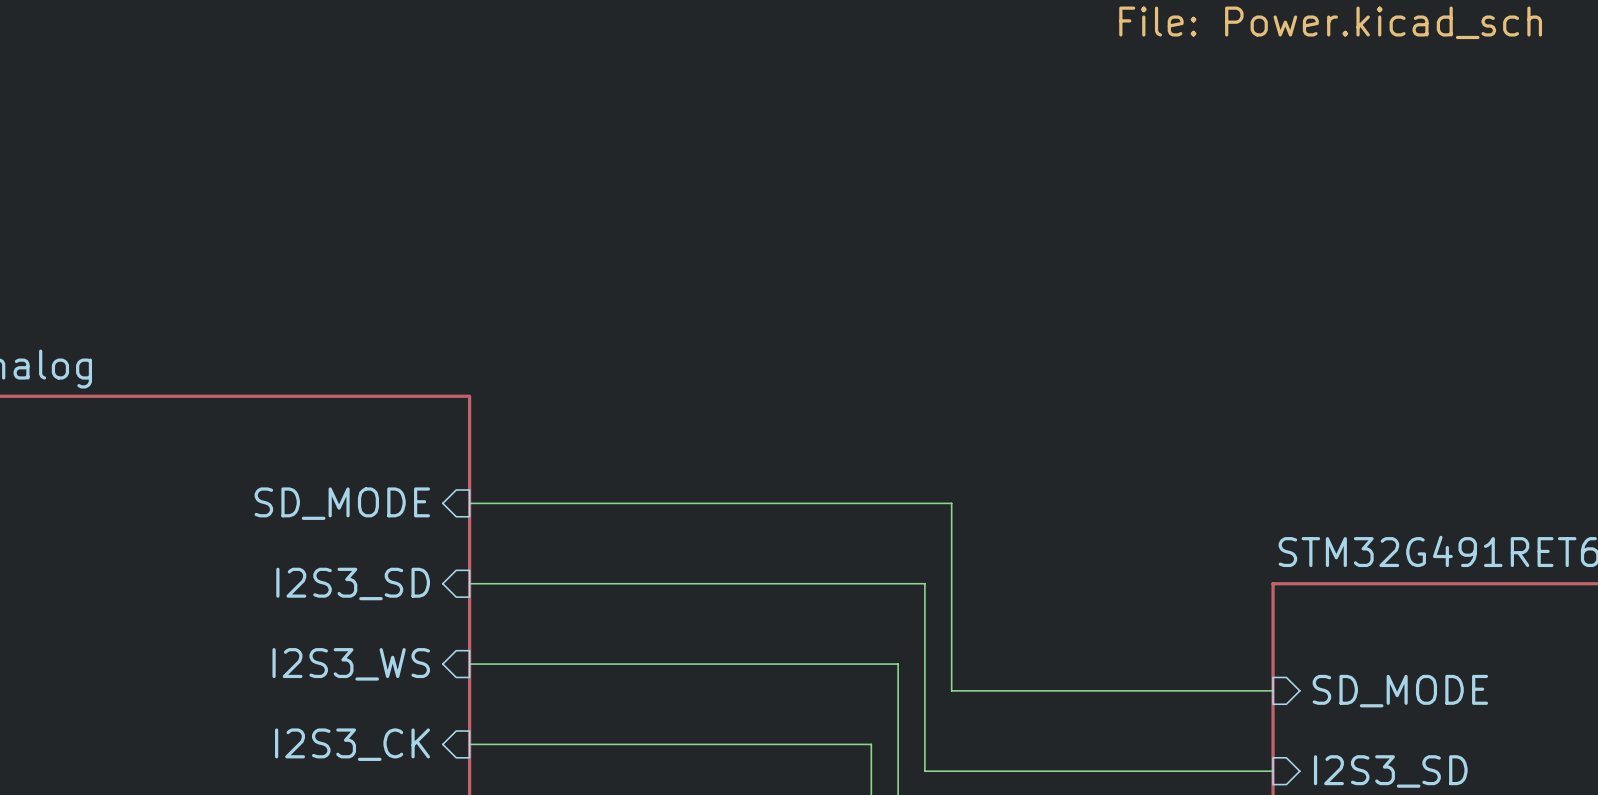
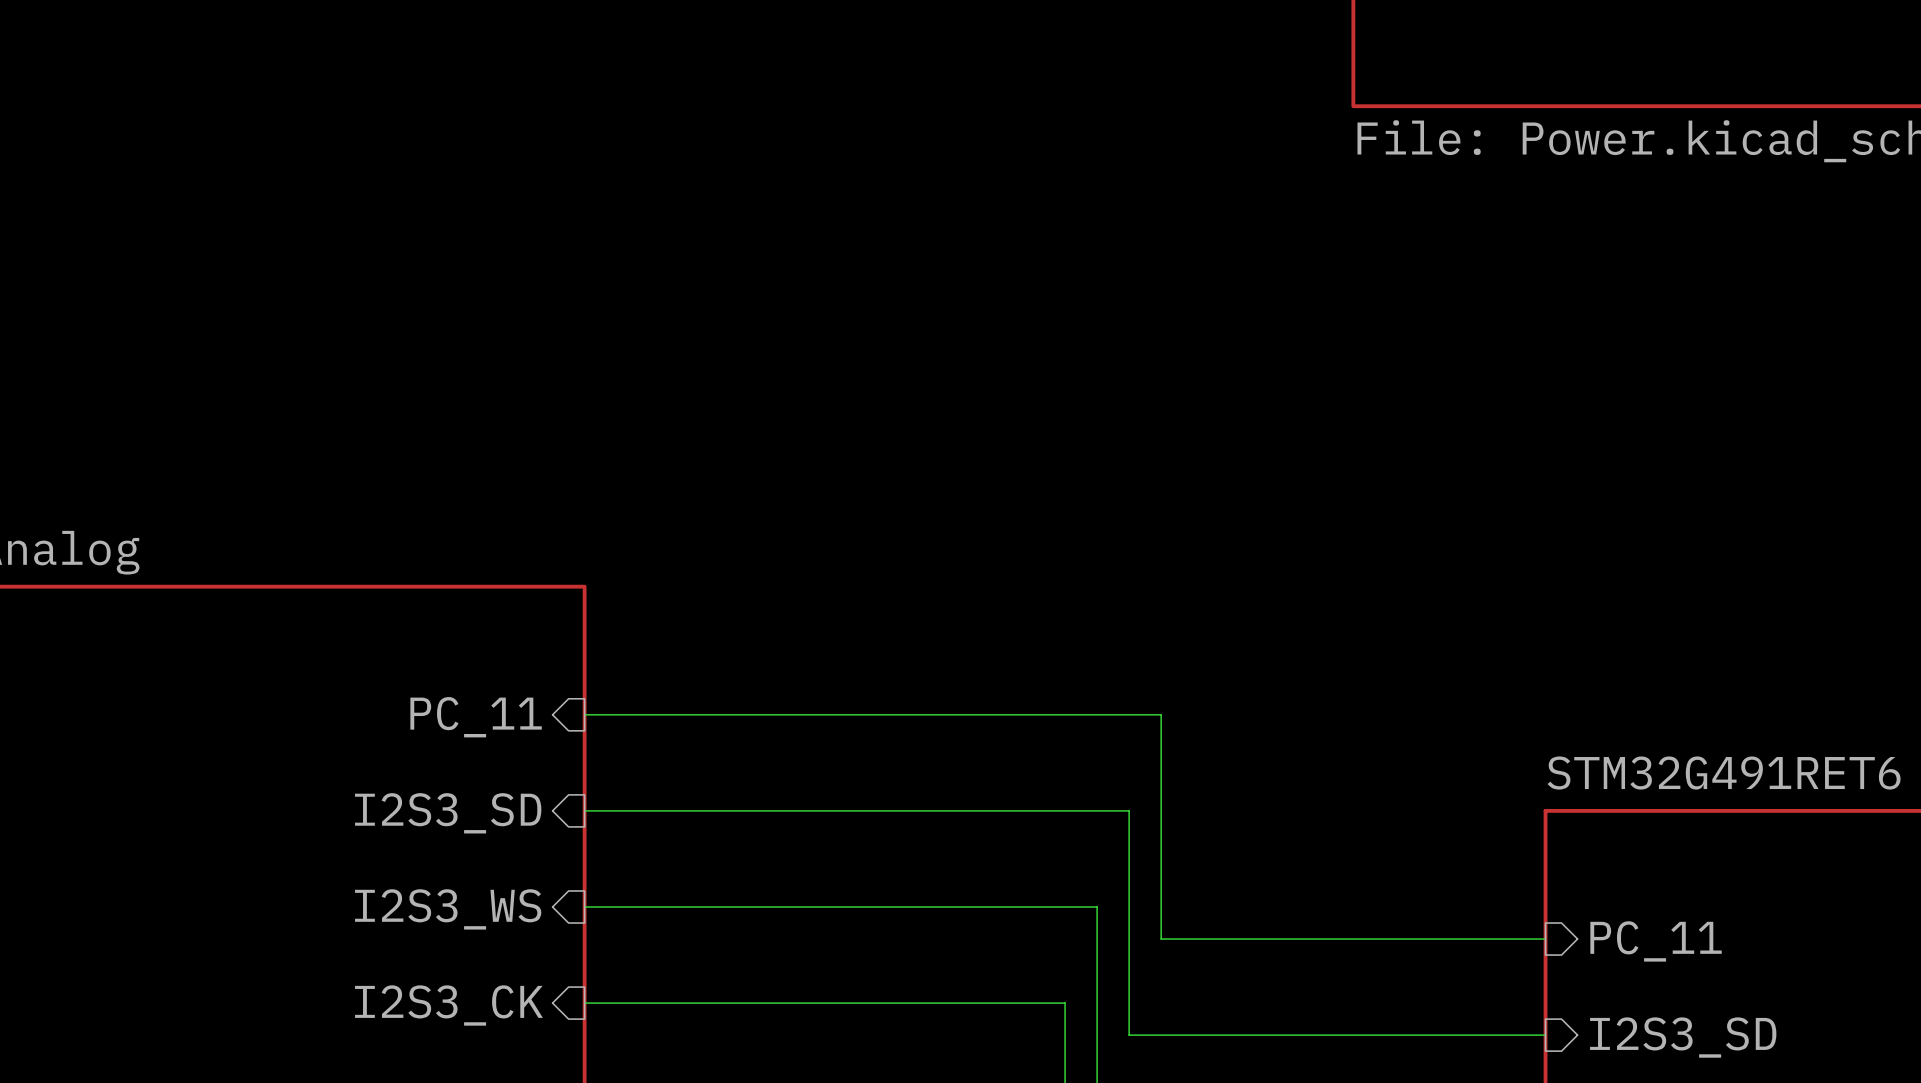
sheet pin: SD_MODE (342, 503) -> PC_11 (476, 717)
sheet pin: SD_MODE (1400, 691) -> PC_11 (1656, 941)

